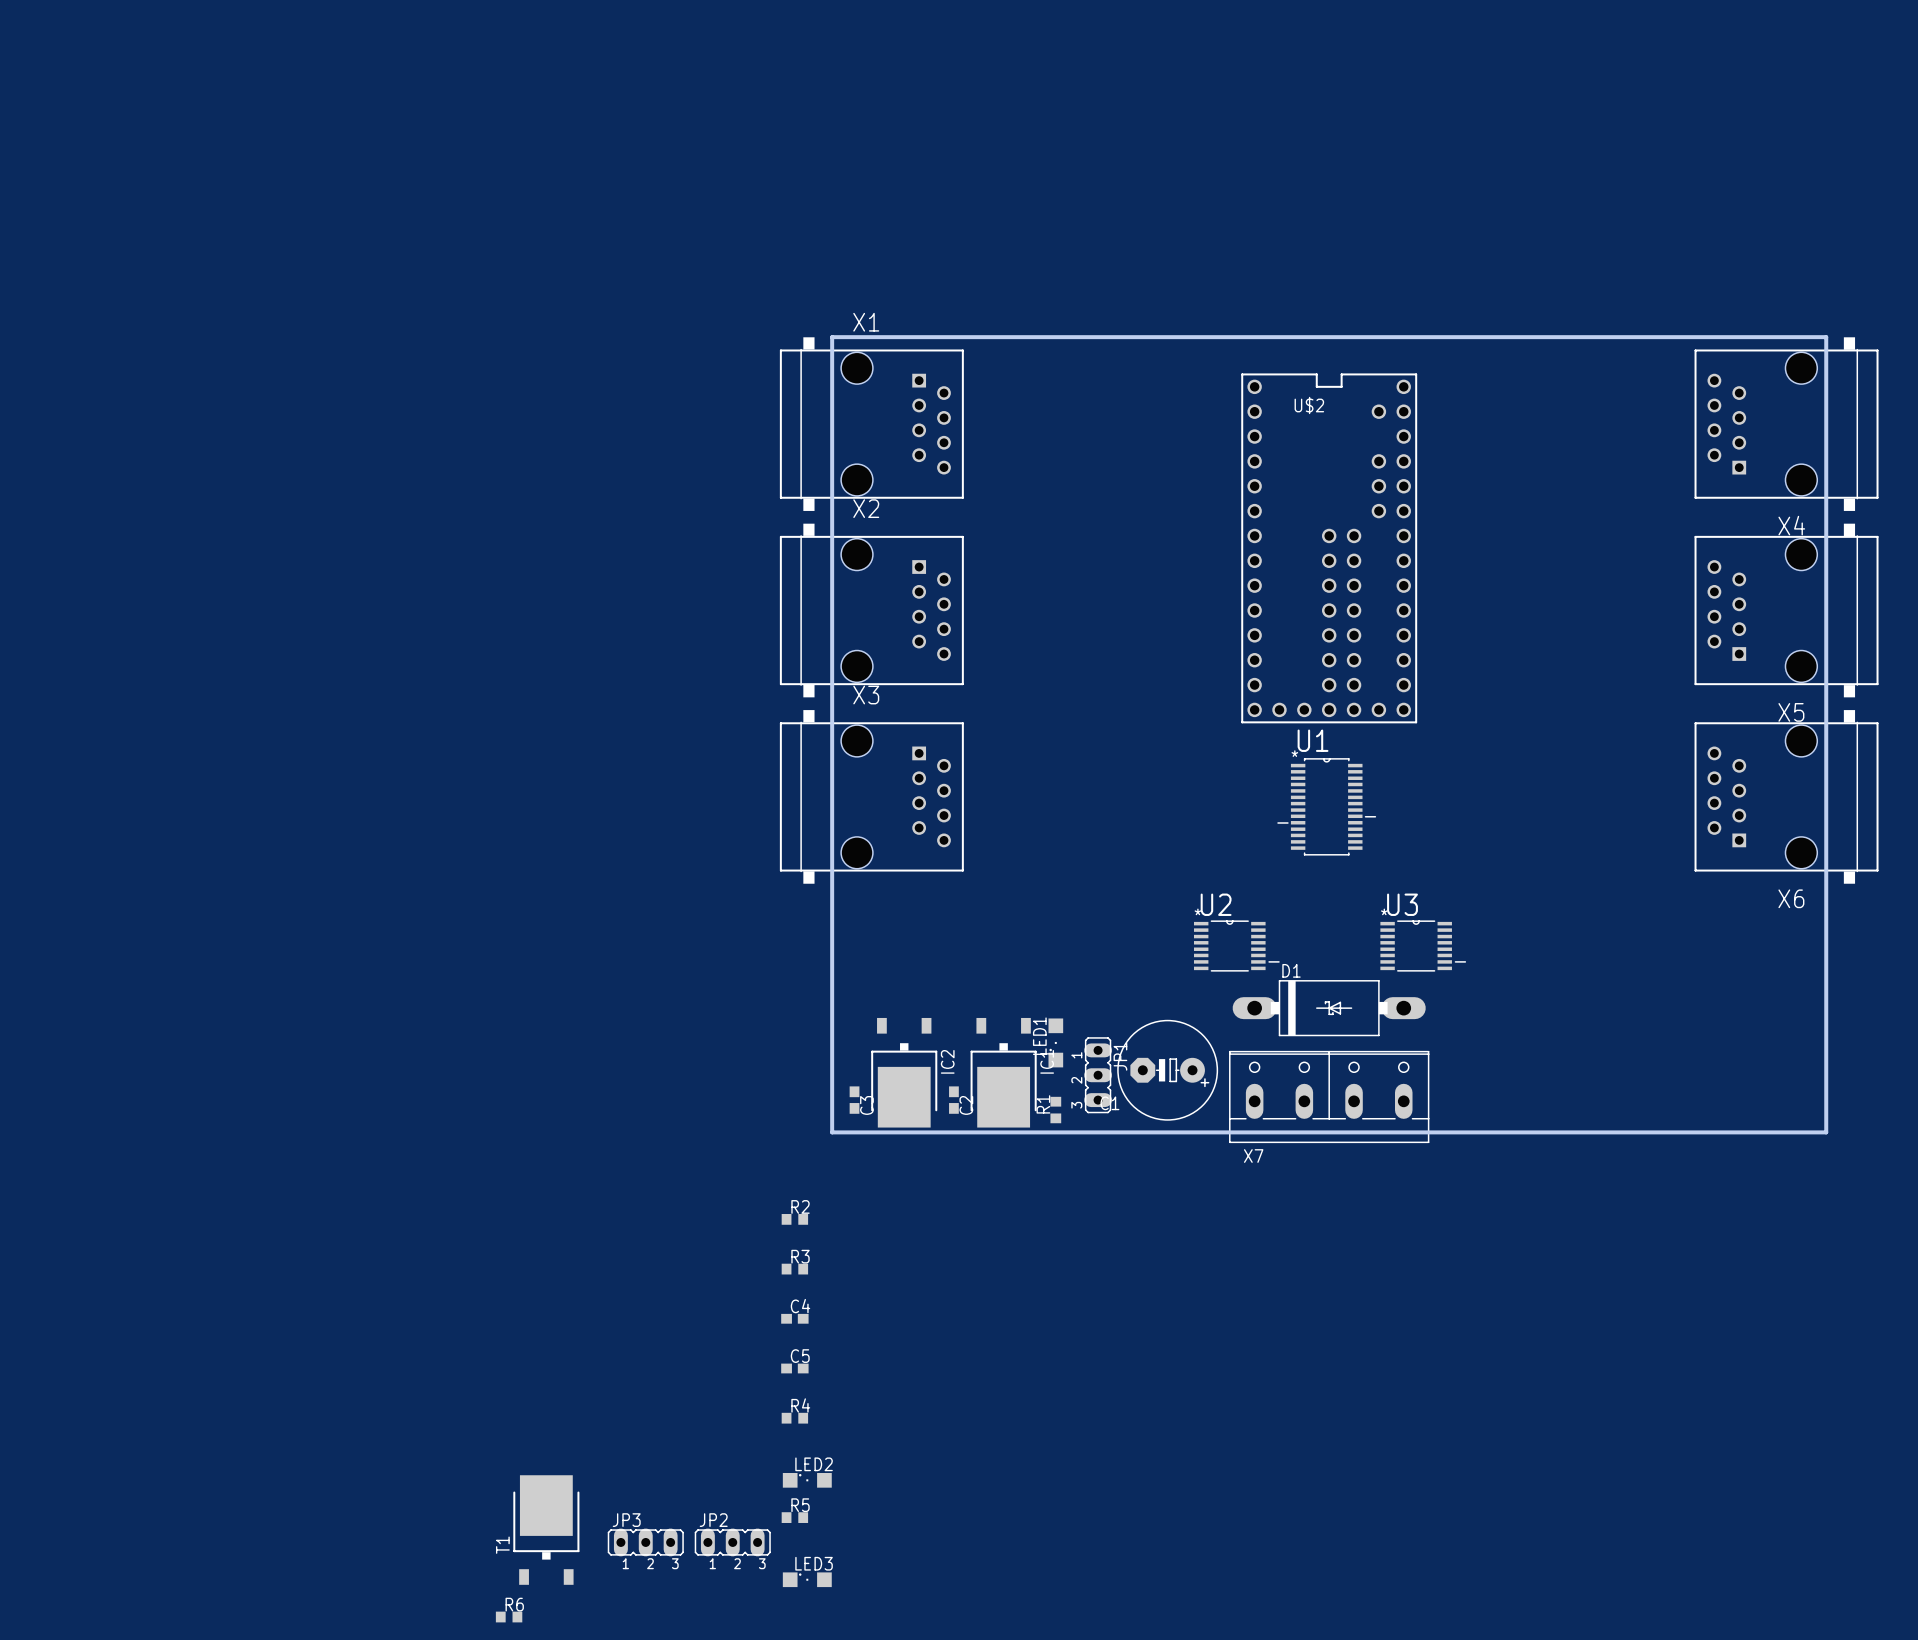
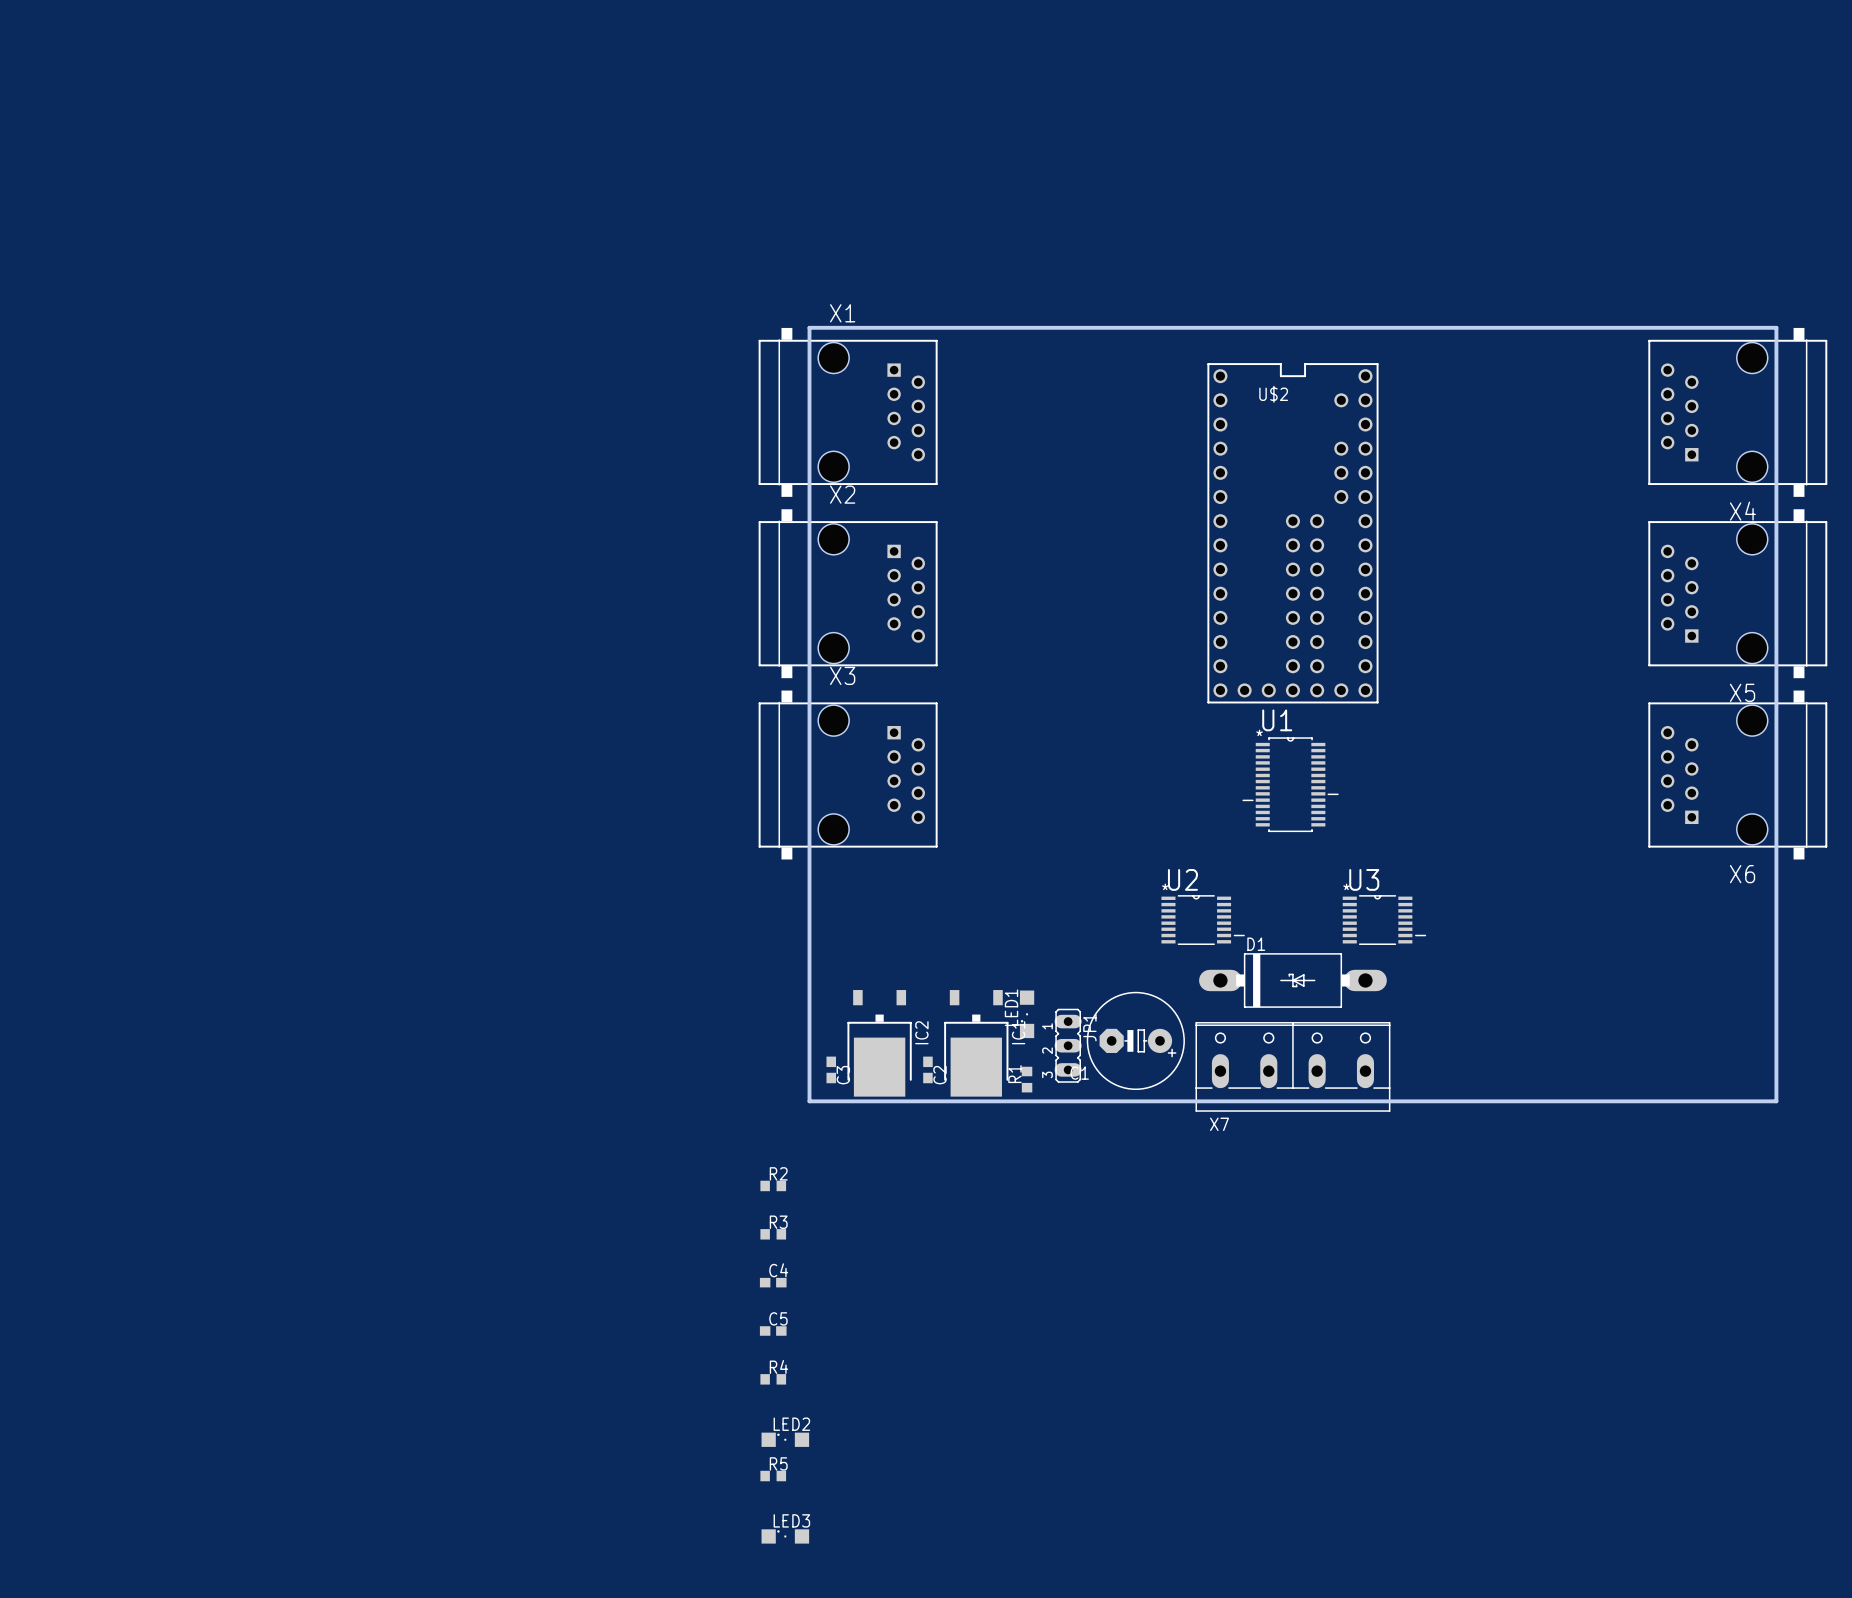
T1: (546, 1530) -> none
JP3: (645, 1542) -> none
JP2: (732, 1542) -> none
R6: (509, 1617) -> none

